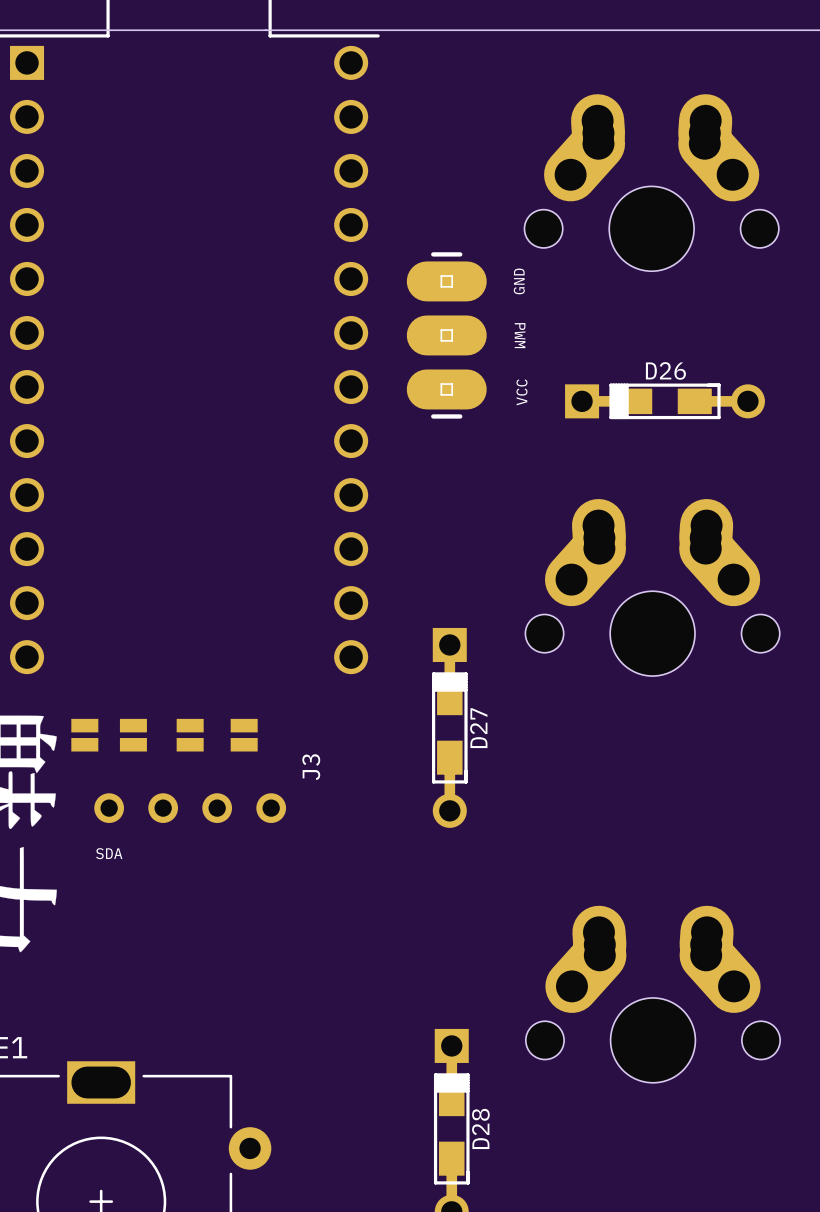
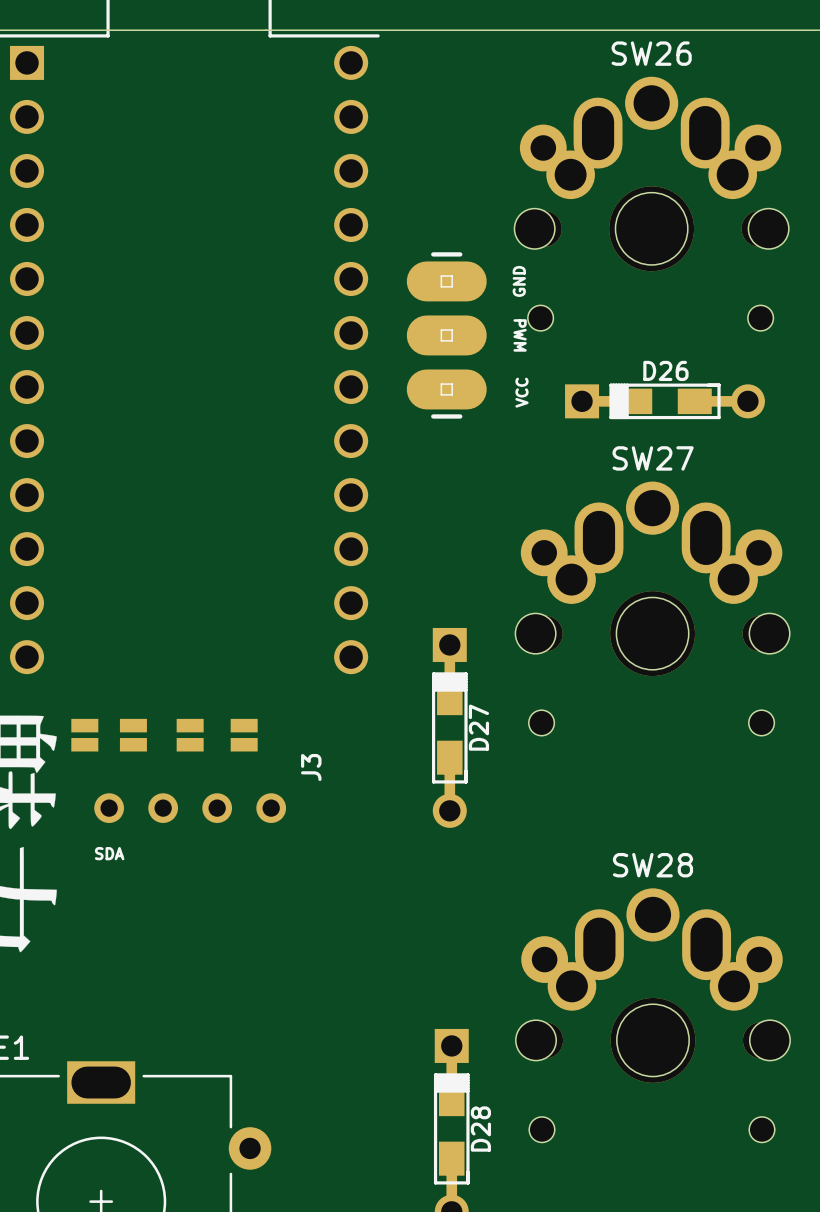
part: (651, 182) -> none
SW26: none -> (651, 203)
part: (652, 587) -> none
SW27: none -> (652, 608)
part: (652, 994) -> none
SW28: none -> (652, 1015)

